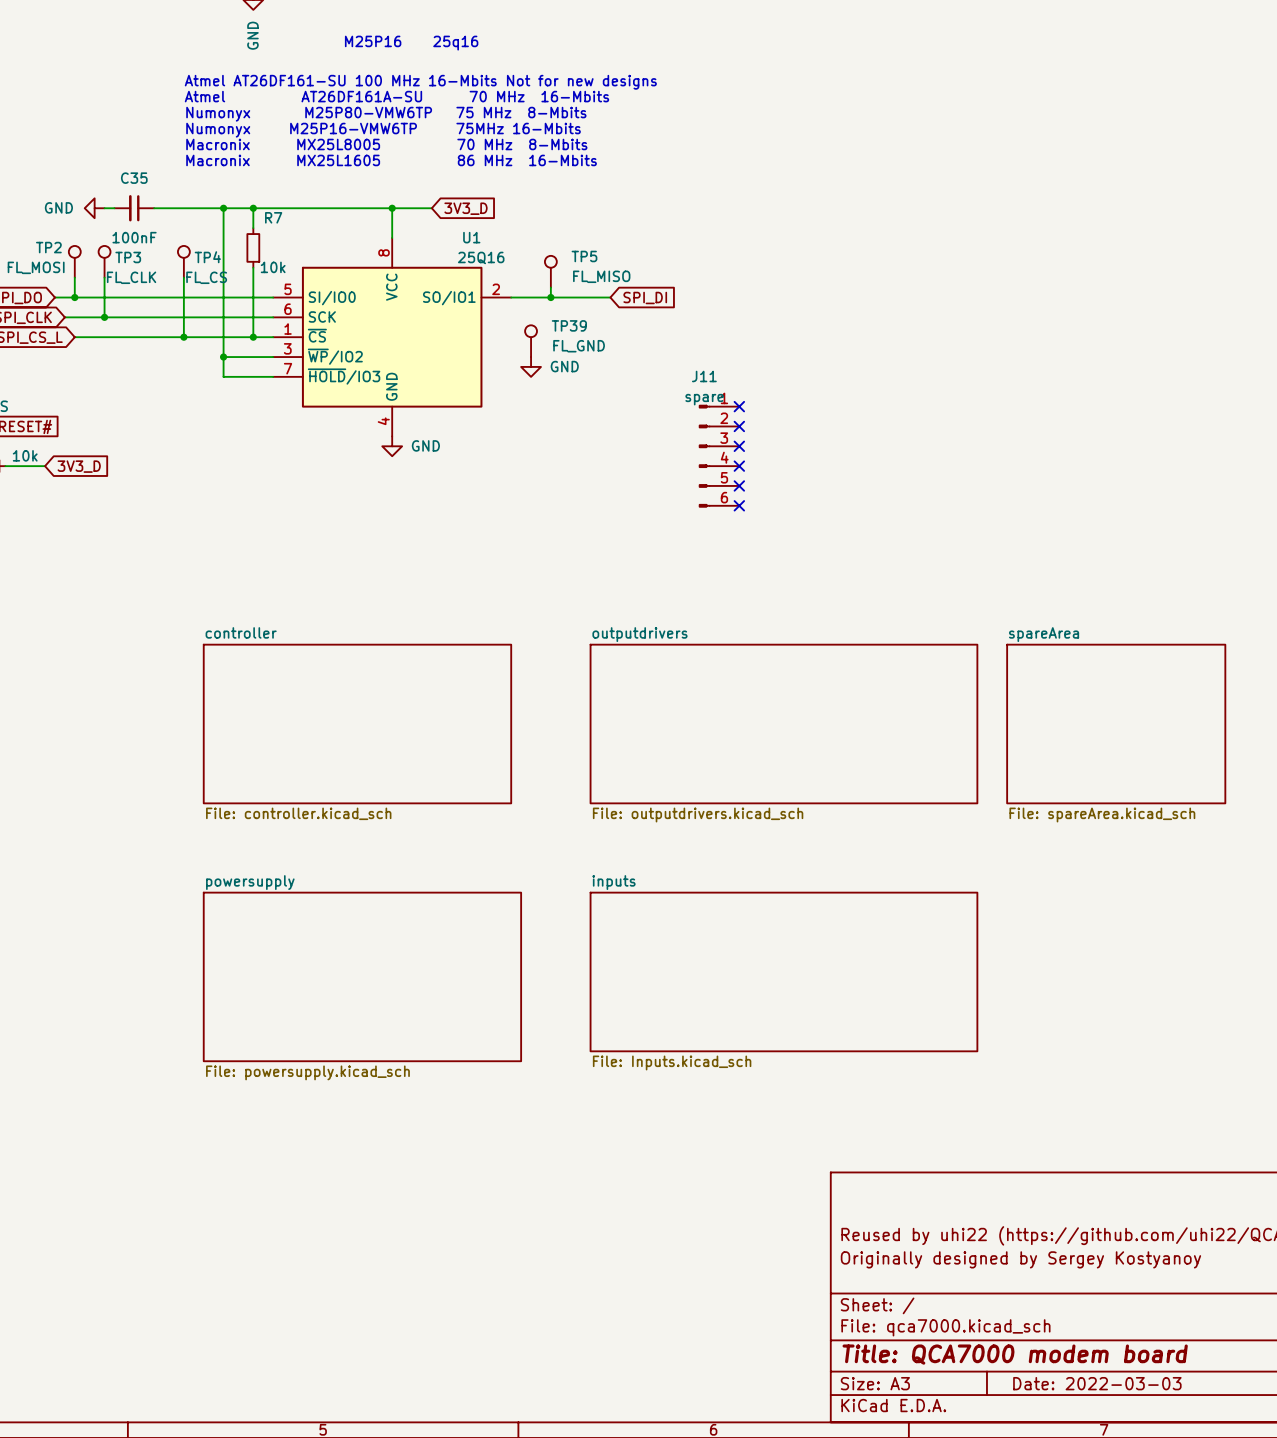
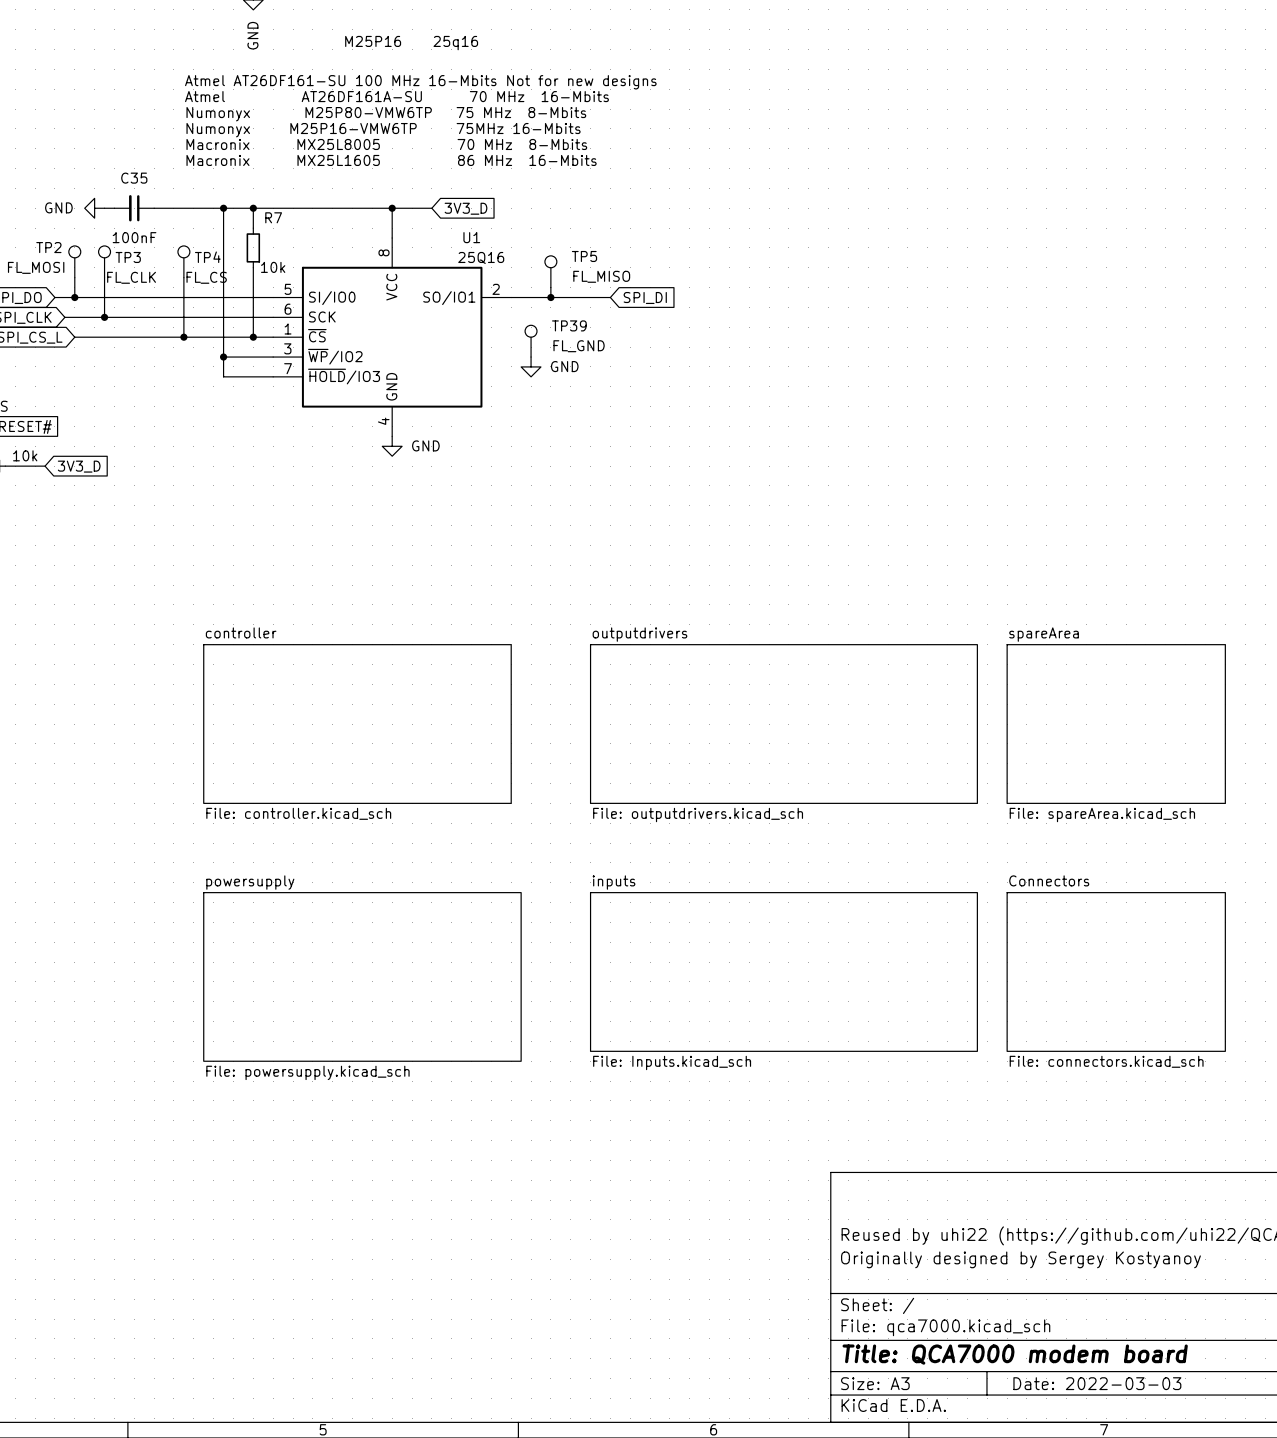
no-connect mark: (739, 406) -> none
no-connect mark: (739, 426) -> none
no-connect mark: (739, 446) -> none
J11: spare (719, 456) -> none
no-connect mark: (739, 466) -> none
no-connect mark: (739, 485) -> none
no-connect mark: (739, 505) -> none
sheet Connectors: none -> File: connectors.kicad_sch (1116, 971)

